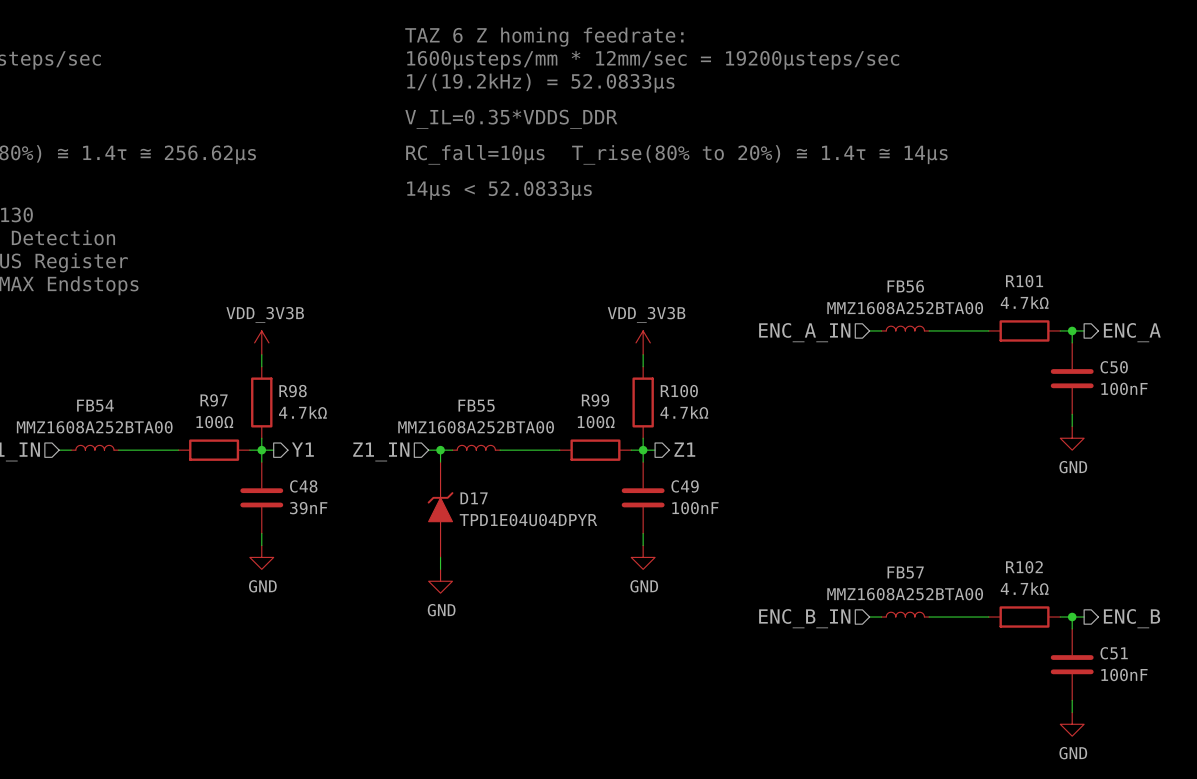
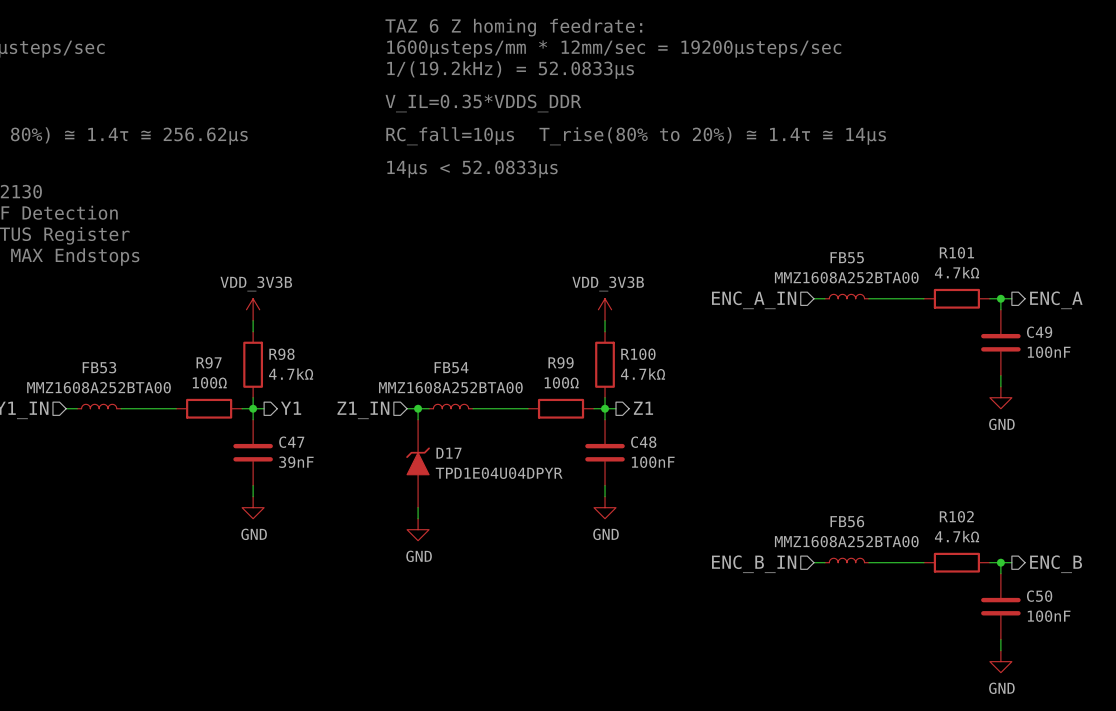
FB56 name: FB56 (905, 286) -> FB55 (847, 257)
C50 name: C50 (1114, 367) -> C49 (1039, 332)
FB54 name: FB54 (95, 405) -> FB53 (99, 367)
FB55 name: FB55 (476, 405) -> FB54 (451, 367)
C48 name: C48 (303, 486) -> C47 (291, 442)
C49 name: C49 (685, 486) -> C48 (643, 442)
FB57 name: FB57 (905, 572) -> FB56 (847, 521)
C51 name: C51 (1114, 653) -> C50 (1039, 596)

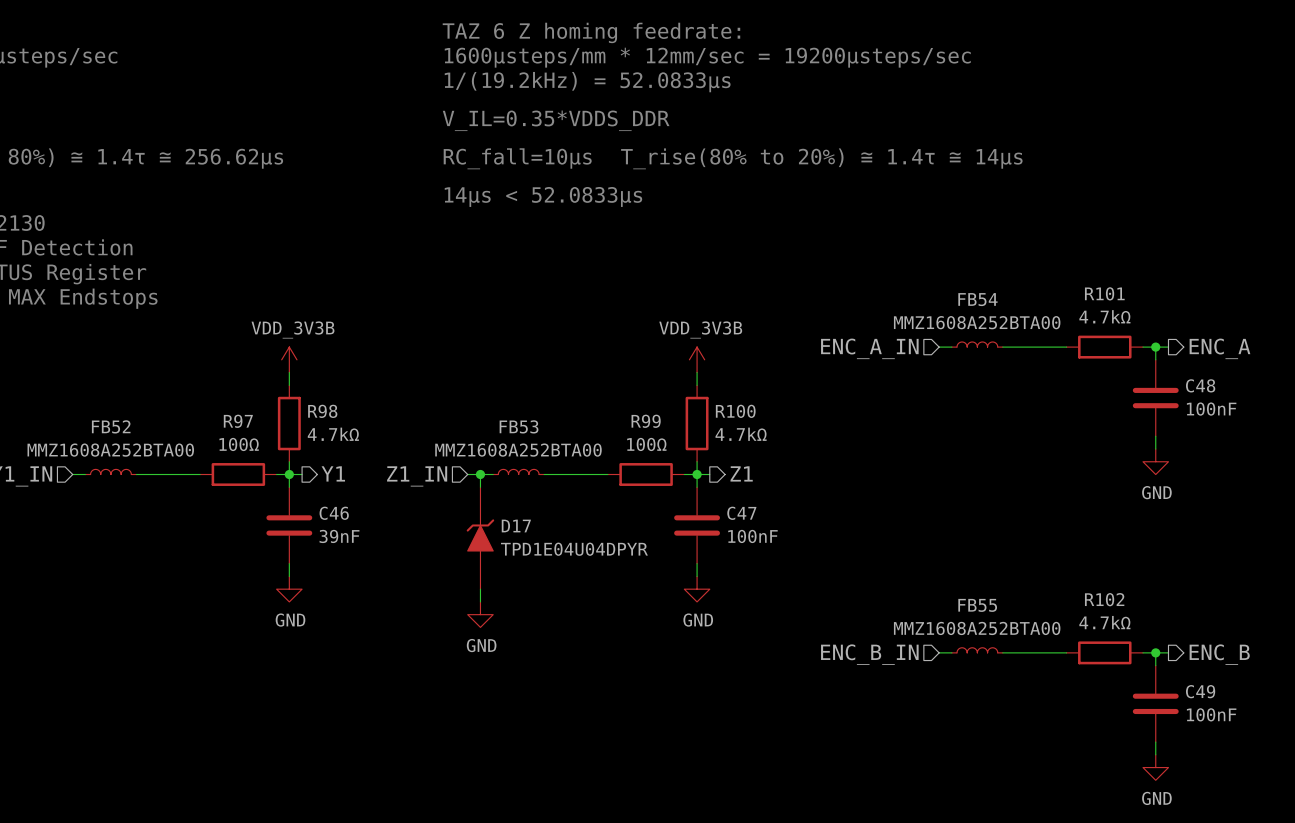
FB55 name: FB55 (847, 257) -> FB54 (977, 299)
C49 name: C49 (1039, 332) -> C48 (1200, 385)
FB53 name: FB53 (99, 367) -> FB52 (111, 426)
FB54 name: FB54 (451, 367) -> FB53 (519, 426)
C47 name: C47 (291, 442) -> C46 (334, 513)
C48 name: C48 (643, 442) -> C47 (741, 513)
FB56 name: FB56 (847, 521) -> FB55 (977, 605)
C50 name: C50 (1039, 596) -> C49 (1200, 691)

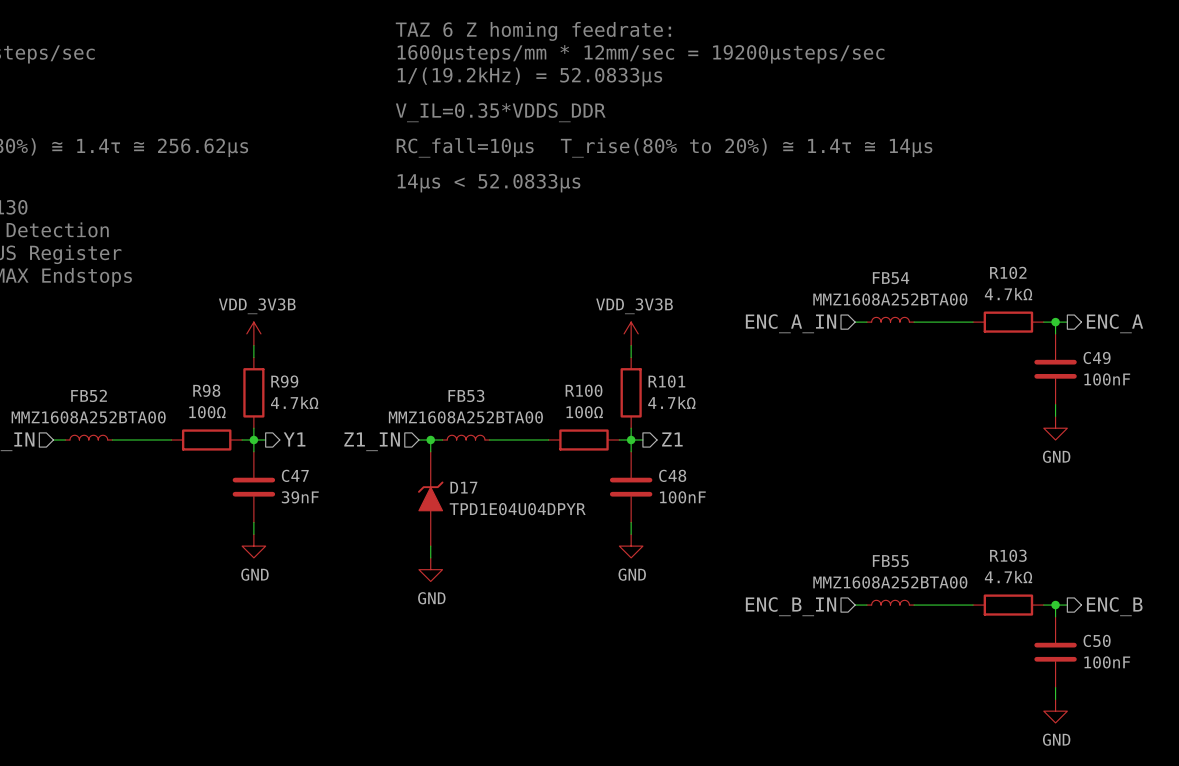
R101 name: R101 (1104, 293) -> R102 (1008, 272)
C48 name: C48 (1200, 385) -> C49 (1097, 357)
R98 name: R98 (322, 411) -> R99 (284, 381)
R100 name: R100 (735, 411) -> R101 (666, 381)
R97 name: R97 (238, 421) -> R98 (206, 390)
R99 name: R99 (646, 421) -> R100 (584, 390)
C46 name: C46 (334, 513) -> C47 (295, 475)
C47 name: C47 (741, 513) -> C48 (672, 475)
R102 name: R102 (1104, 599) -> R103 (1008, 555)
C49 name: C49 (1200, 691) -> C50 (1097, 640)

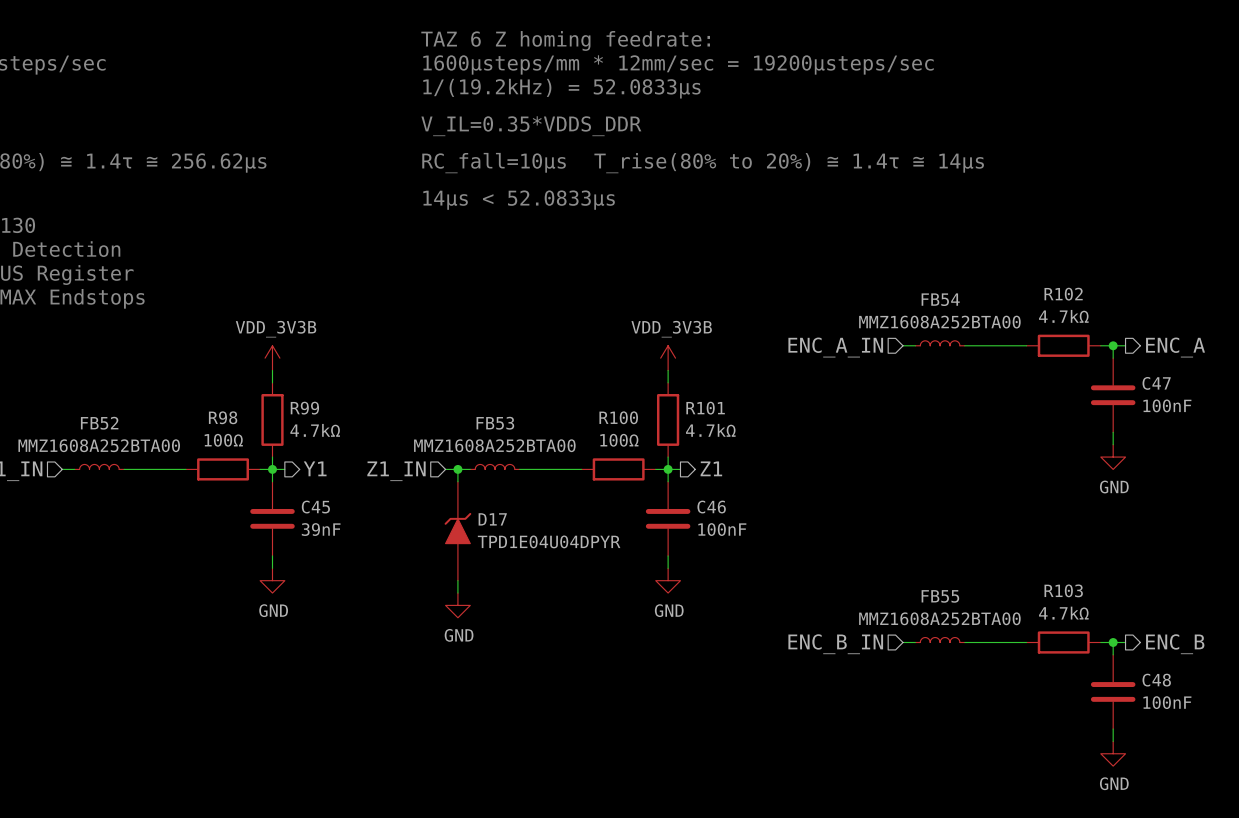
C49 name: C49 (1097, 357) -> C47 (1156, 383)
C47 name: C47 (295, 475) -> C45 (315, 507)
C48 name: C48 (672, 475) -> C46 (711, 507)
C50 name: C50 (1097, 640) -> C48 (1156, 680)

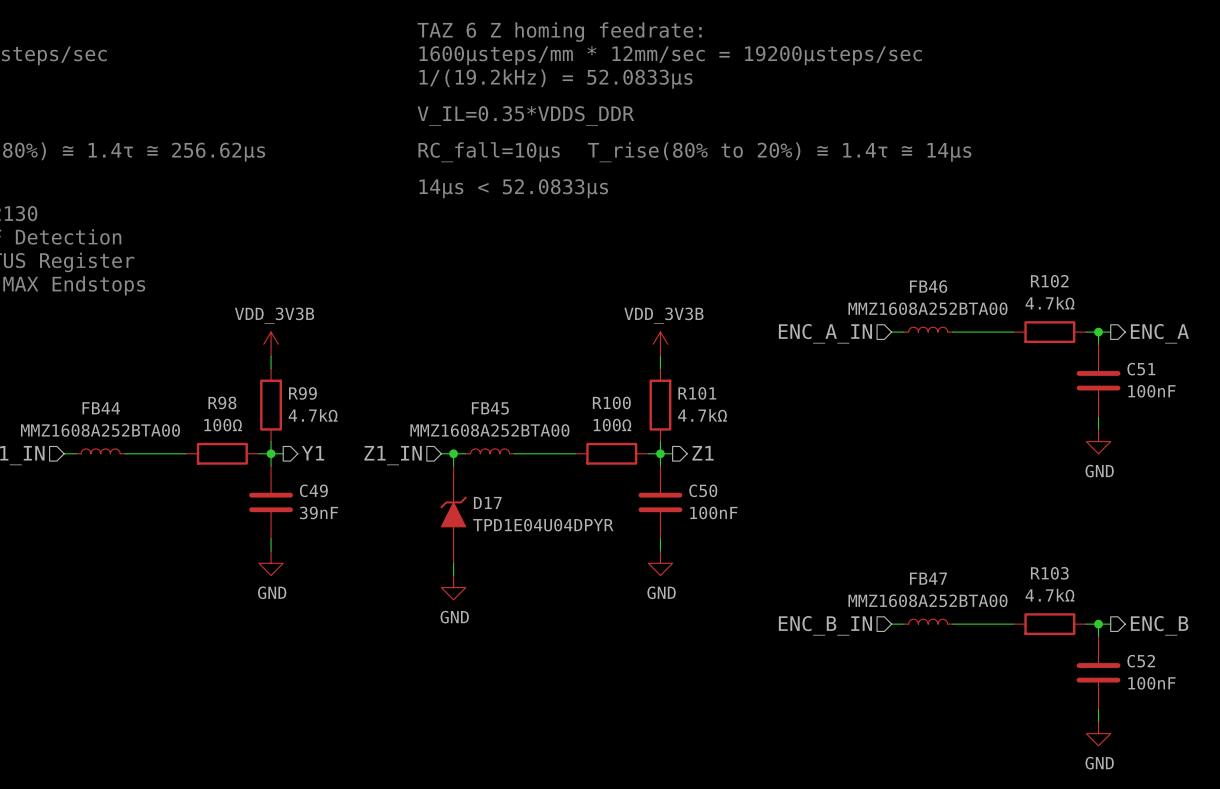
FB54 name: FB54 (940, 299) -> FB46 (928, 286)
C47 name: C47 (1156, 383) -> C51 (1141, 369)
FB52 name: FB52 (99, 423) -> FB44 (101, 408)
FB53 name: FB53 (495, 423) -> FB45 (490, 408)
C45 name: C45 (315, 507) -> C49 (313, 490)
C46 name: C46 (711, 507) -> C50 (703, 490)
FB55 name: FB55 (940, 596) -> FB47 (928, 578)
C48 name: C48 (1156, 680) -> C52 (1141, 661)

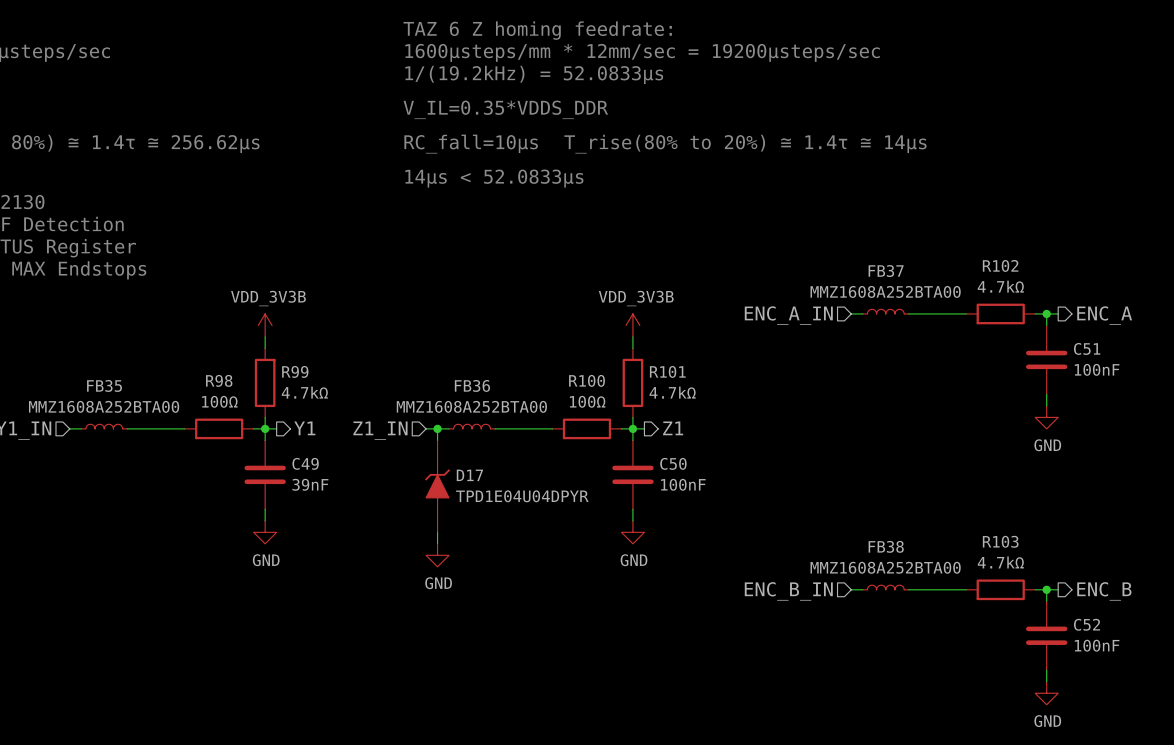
FB46 name: FB46 (928, 286) -> FB37 (886, 271)
FB44 name: FB44 (101, 408) -> FB35 (104, 385)
FB45 name: FB45 (490, 408) -> FB36 (472, 385)
FB47 name: FB47 (928, 578) -> FB38 (886, 546)

